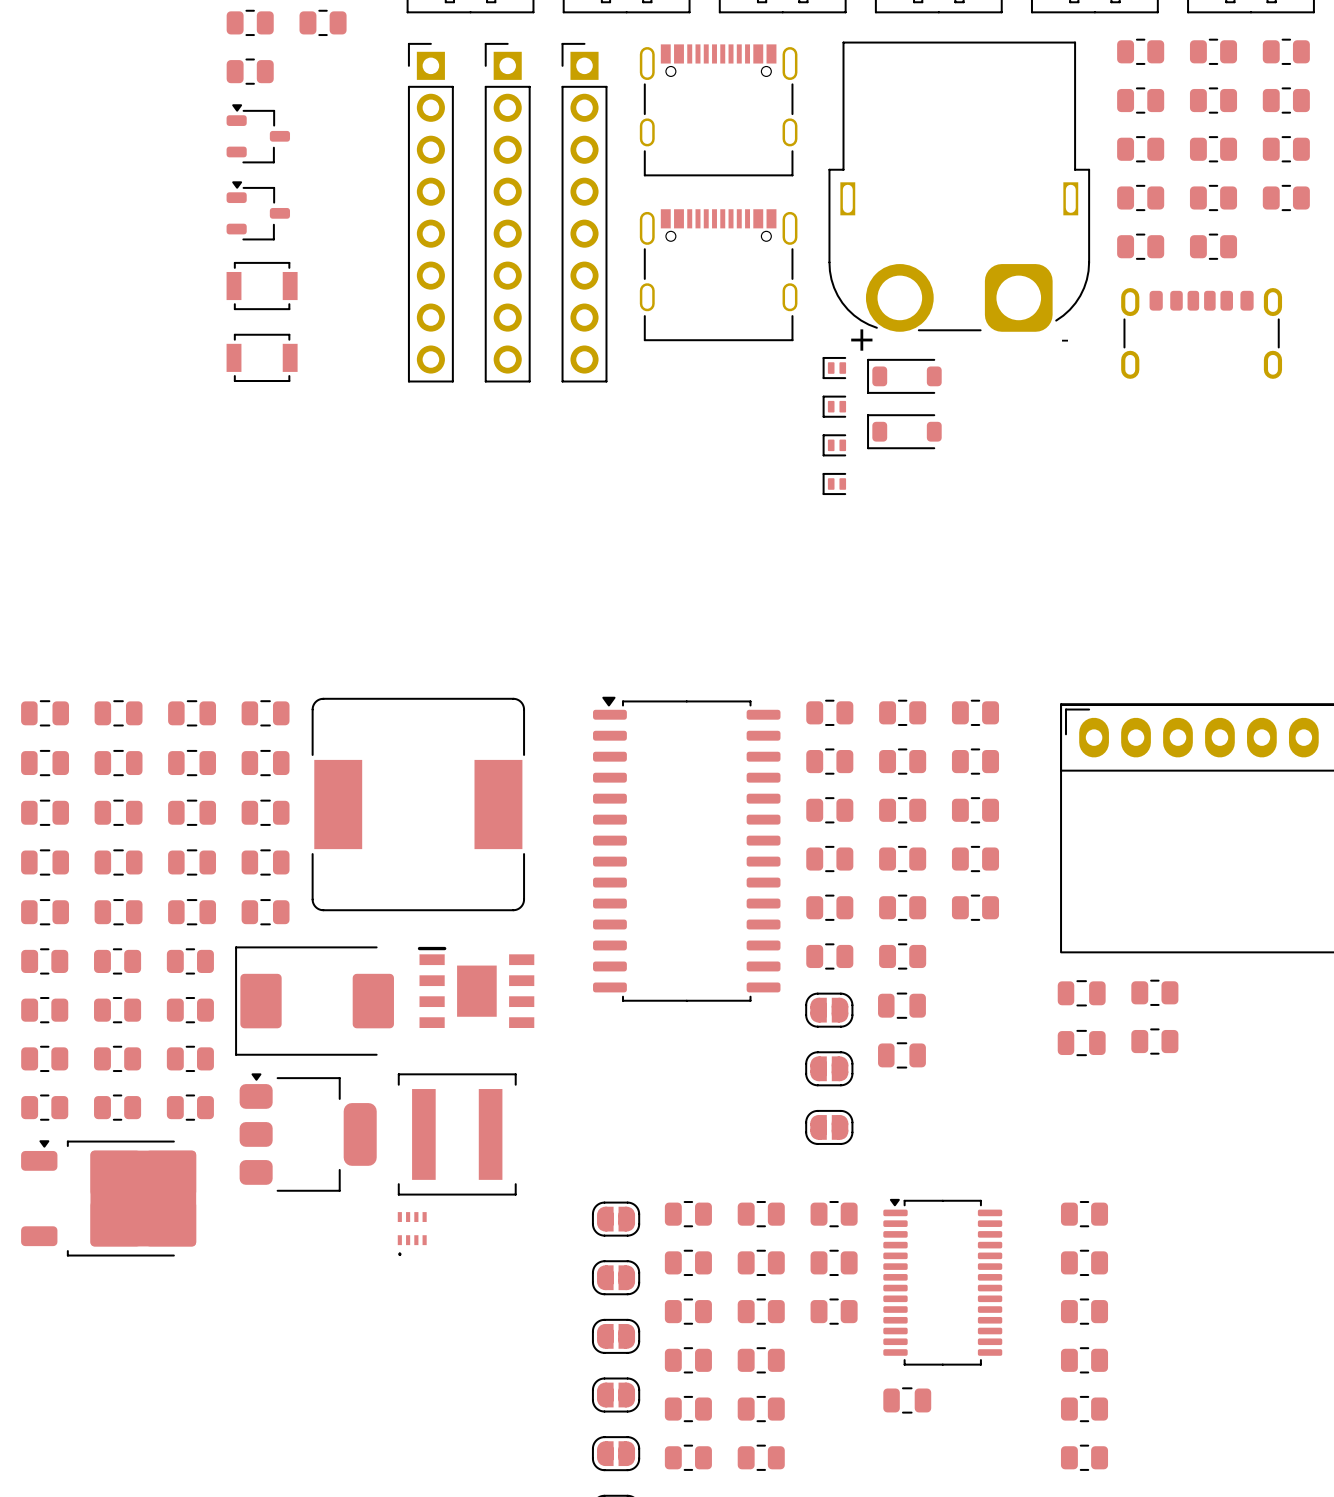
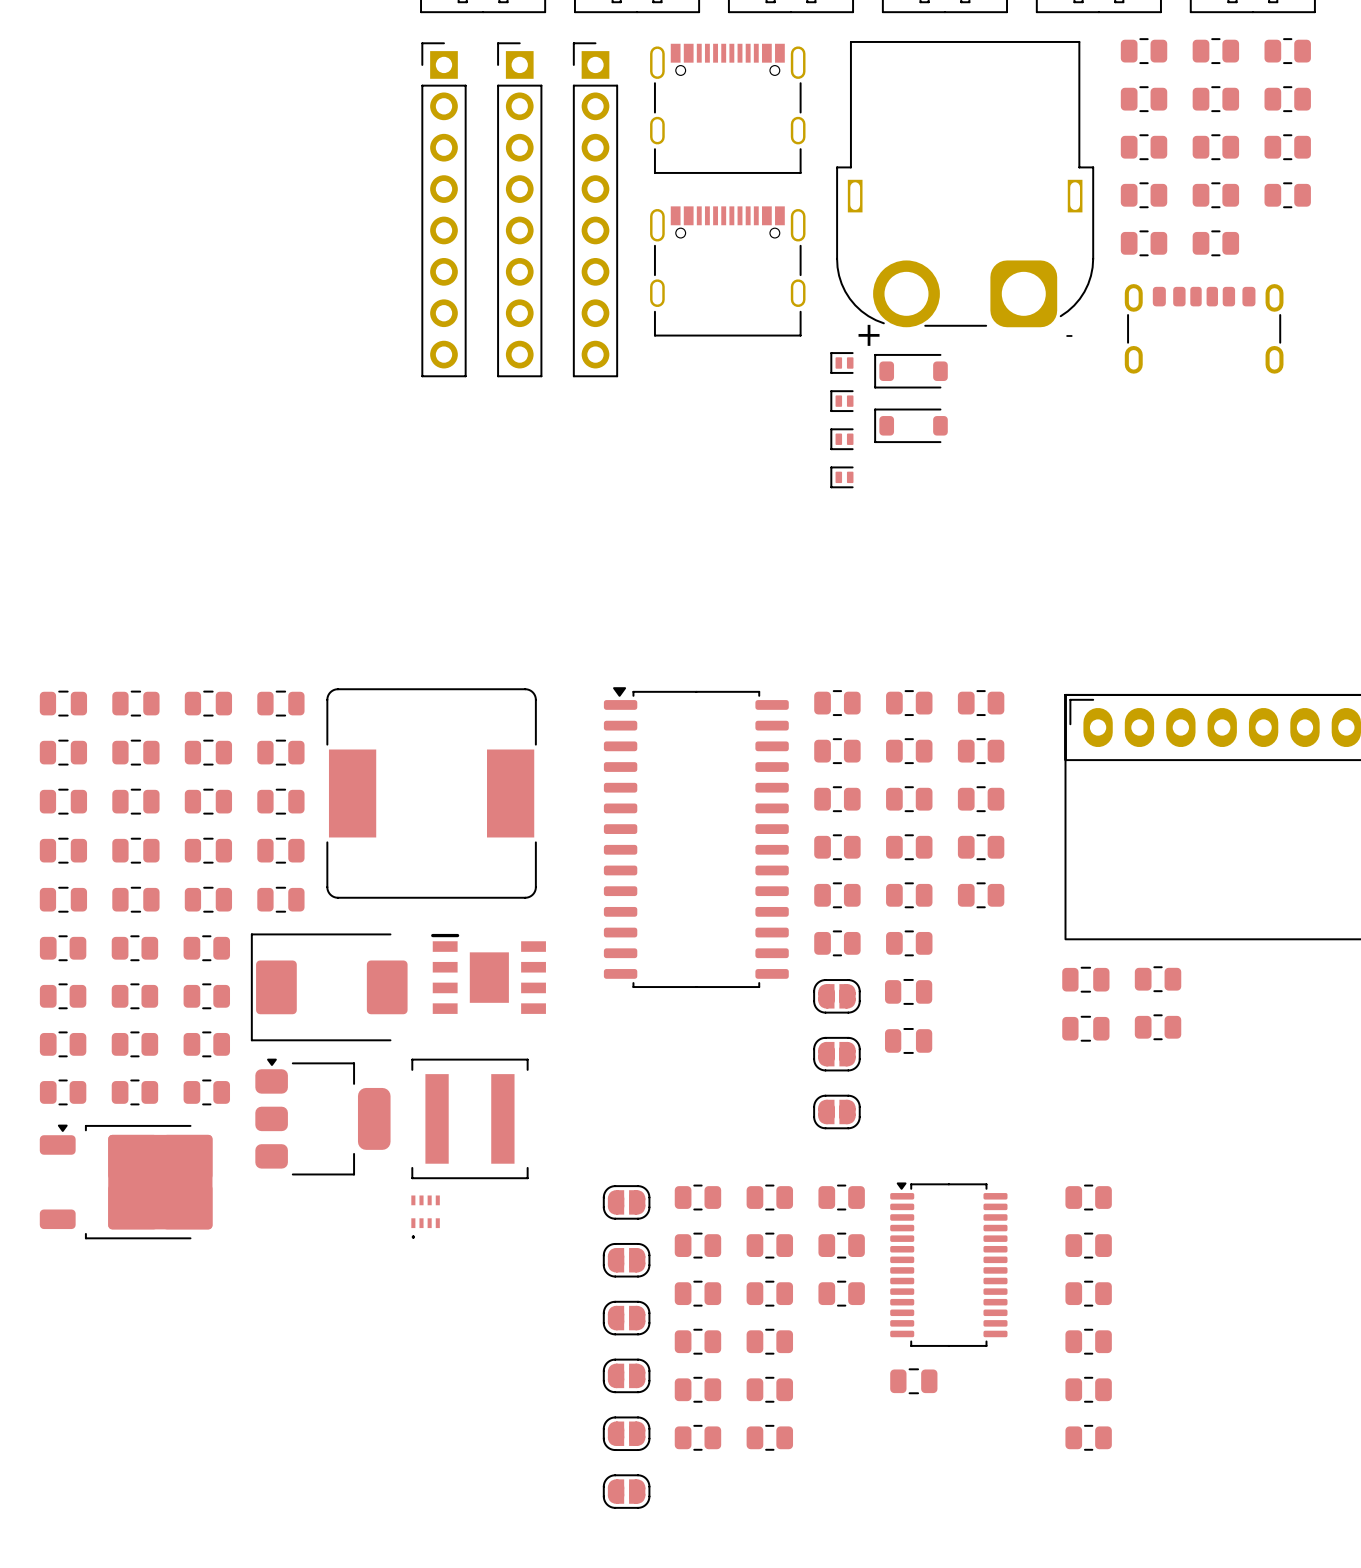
part: (250, 22) -> none
part: (323, 22) -> none
part: (250, 71) -> none
part: (258, 133) -> none
part: (258, 210) -> none
part: (262, 286) -> none
part: (262, 357) -> none

